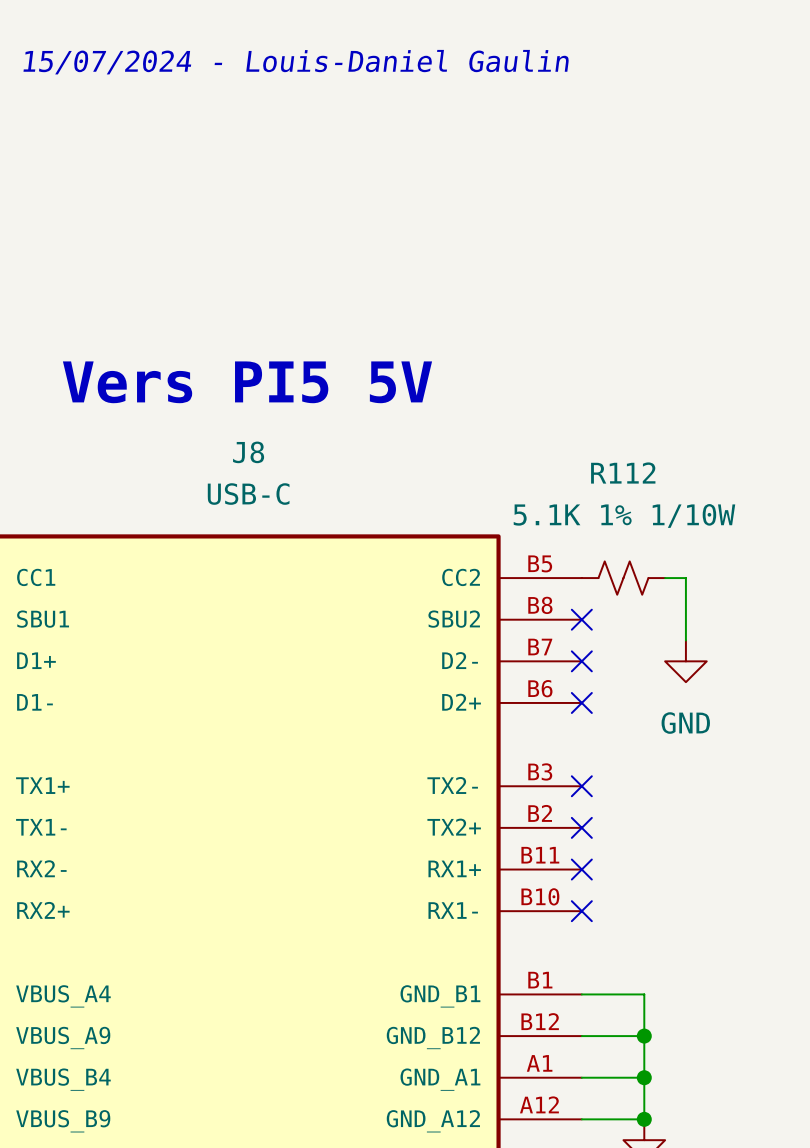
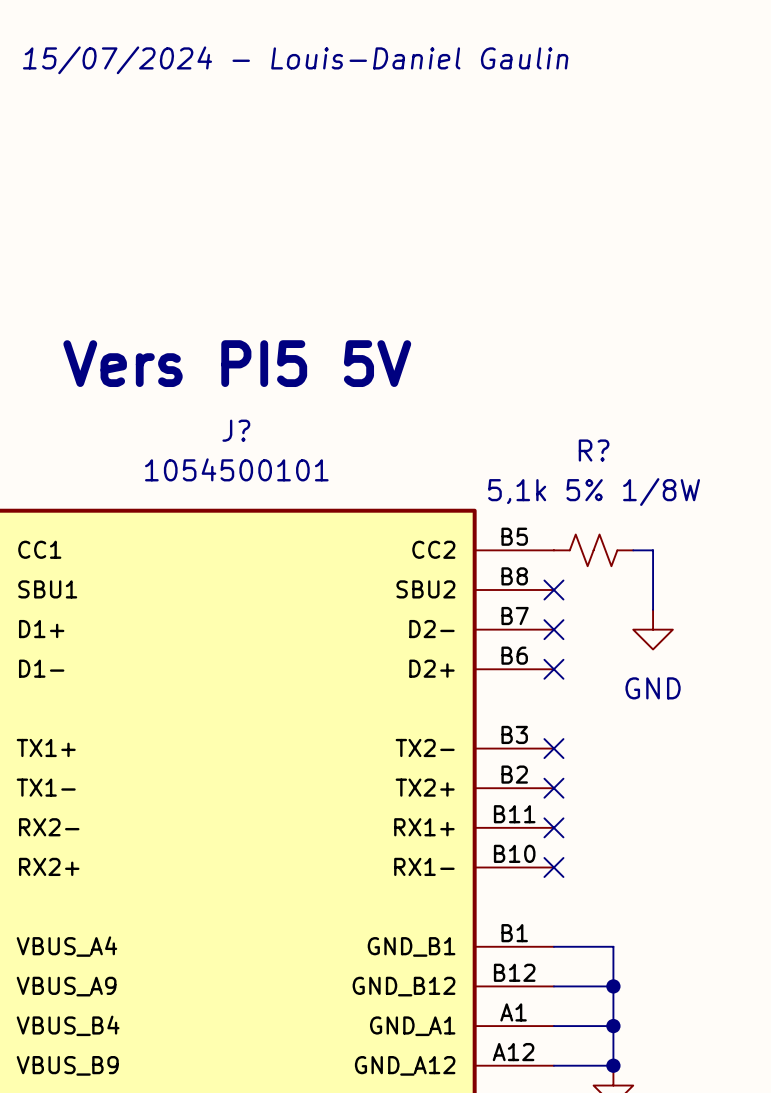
J8 name: J8 (248, 452) -> J? (236, 430)
R112 name: R112 (623, 473) -> R? (594, 450)
J8 value: USB-C (248, 494) -> 1054500101 (236, 469)
R112 value: 5.1K 1% 1/10W (624, 515) -> 5,1k 5% 1/8W (594, 492)

